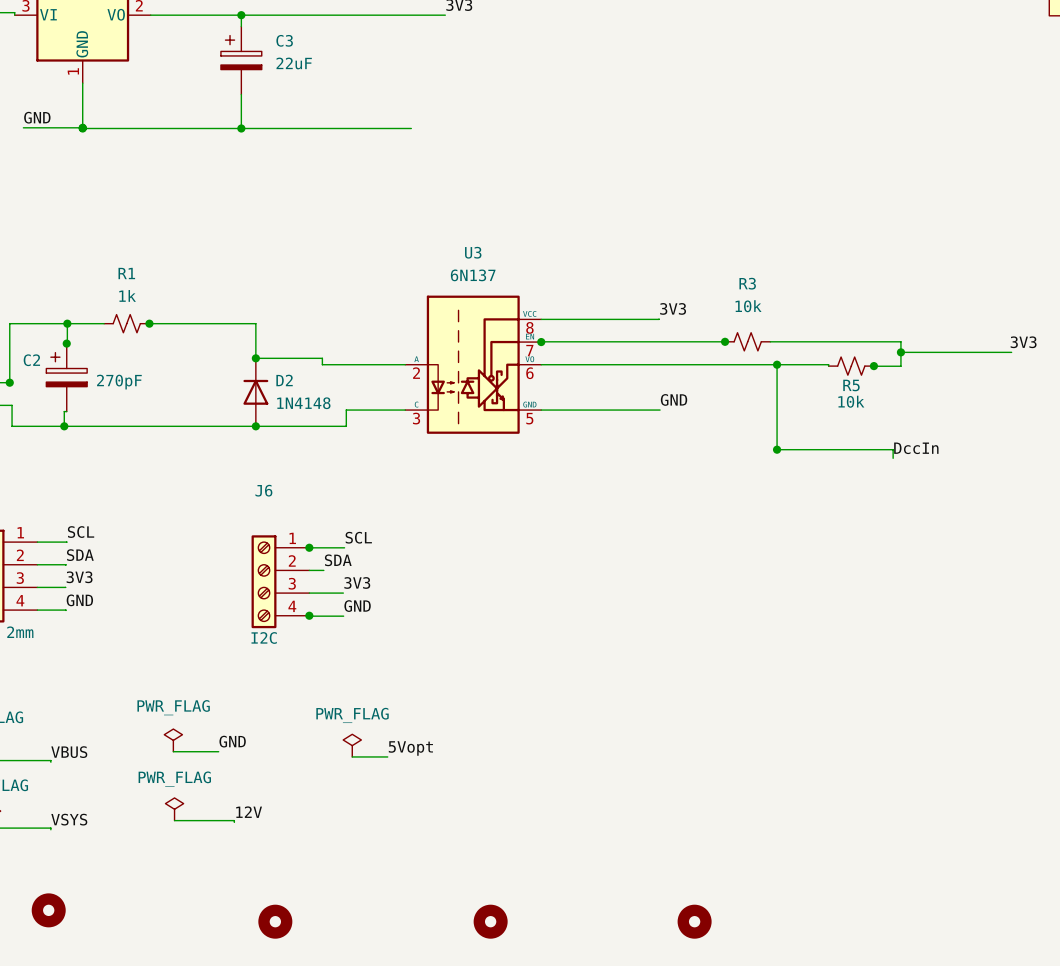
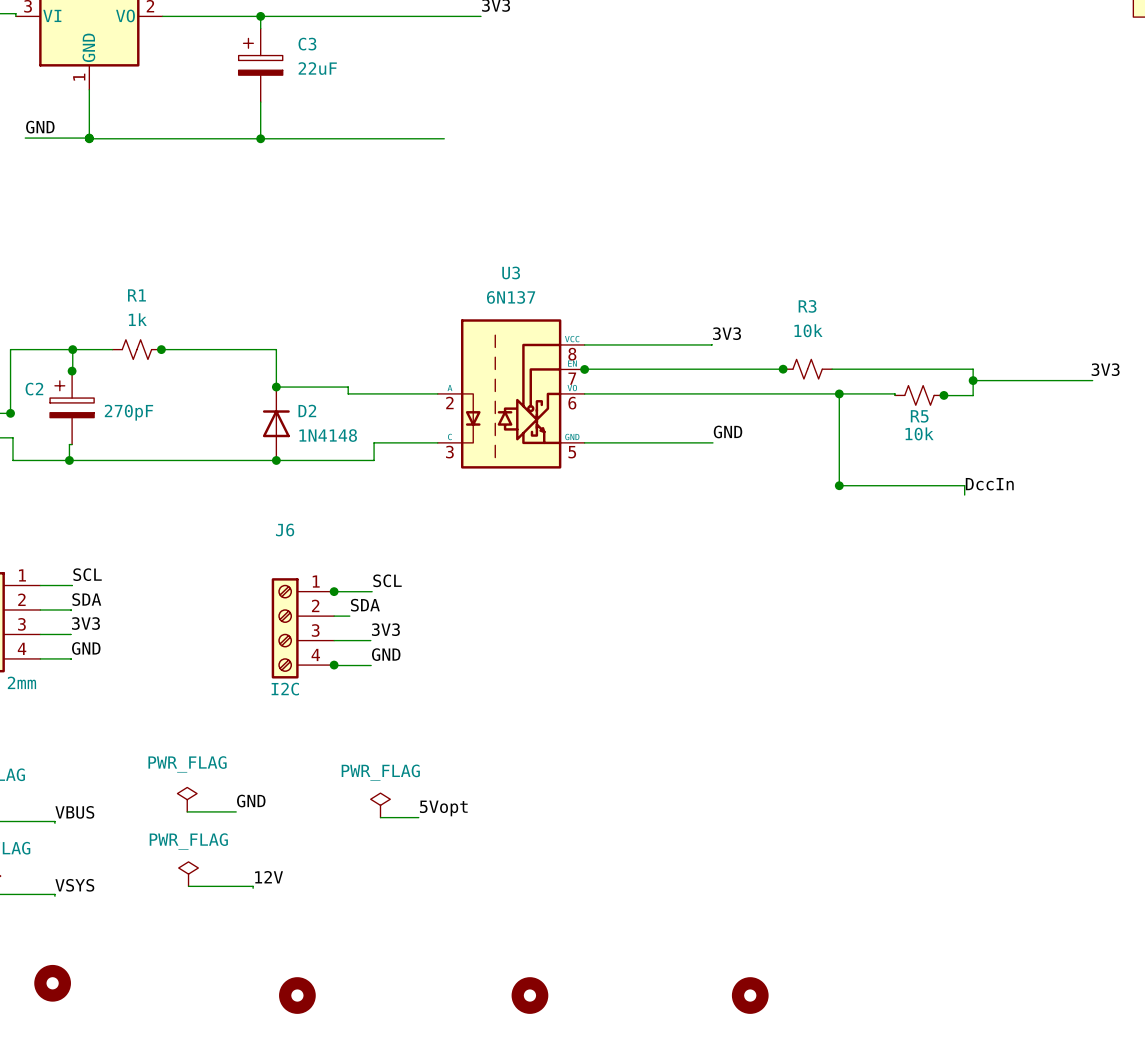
U3 symbol: [405, 295, 542, 434] -> [437, 319, 585, 469]

